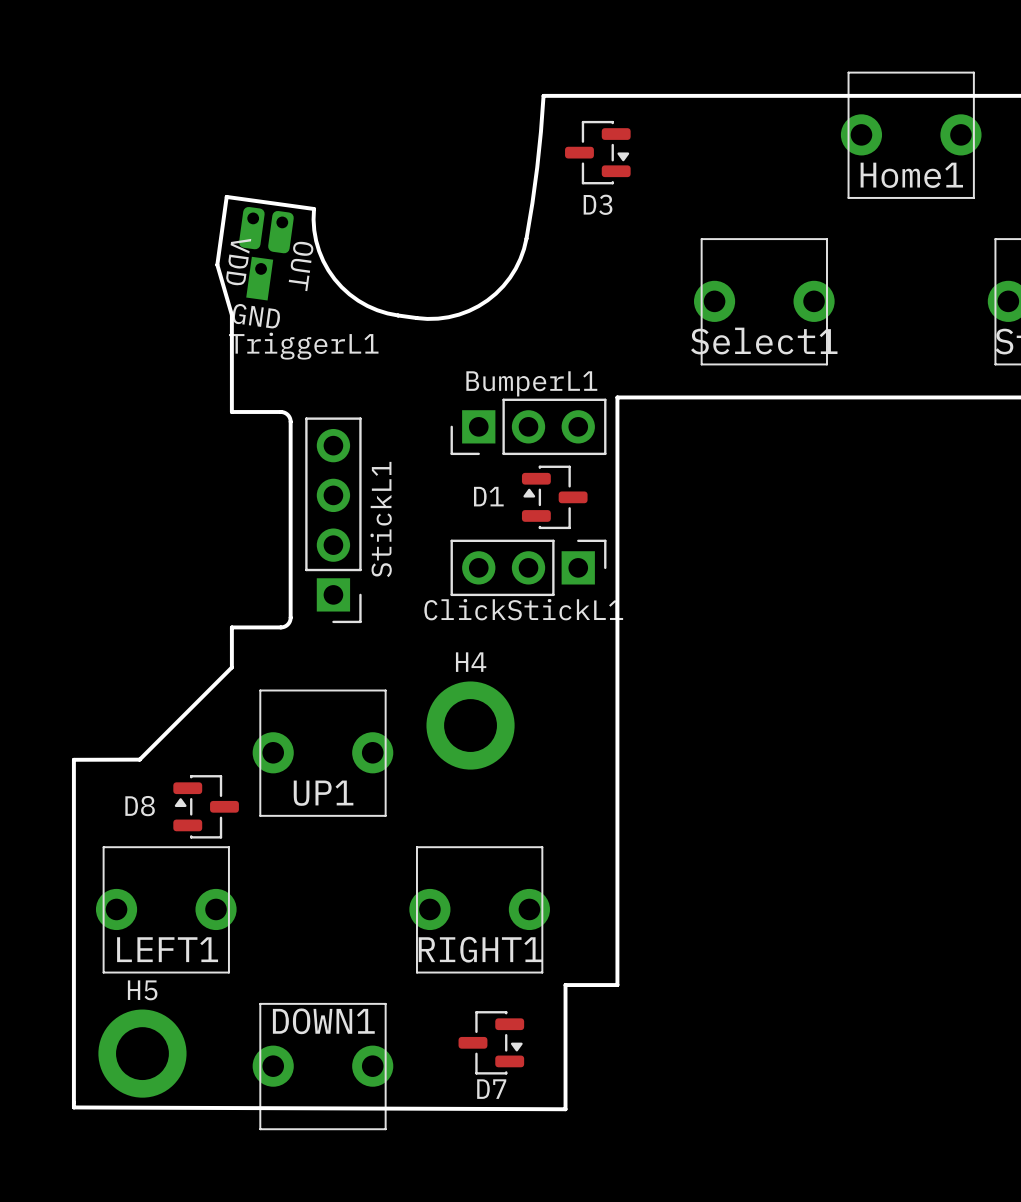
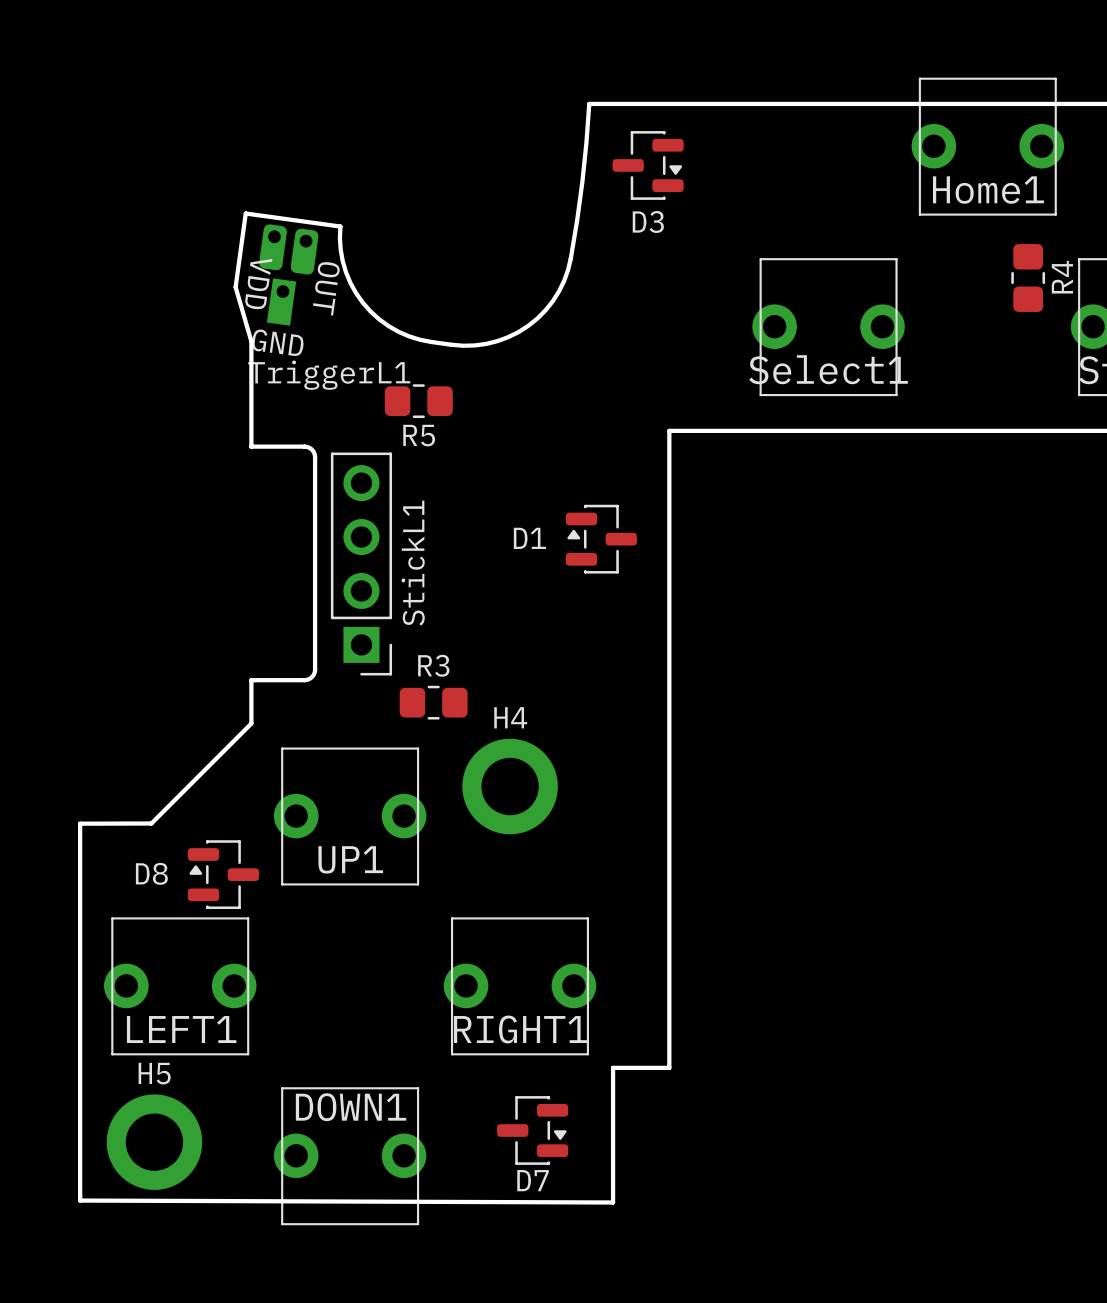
R4: none -> (1028, 278)
R5: none -> (418, 401)
BumperL1: (528, 426) -> none
ClickStickL1: (528, 567) -> none
R3: none -> (433, 702)

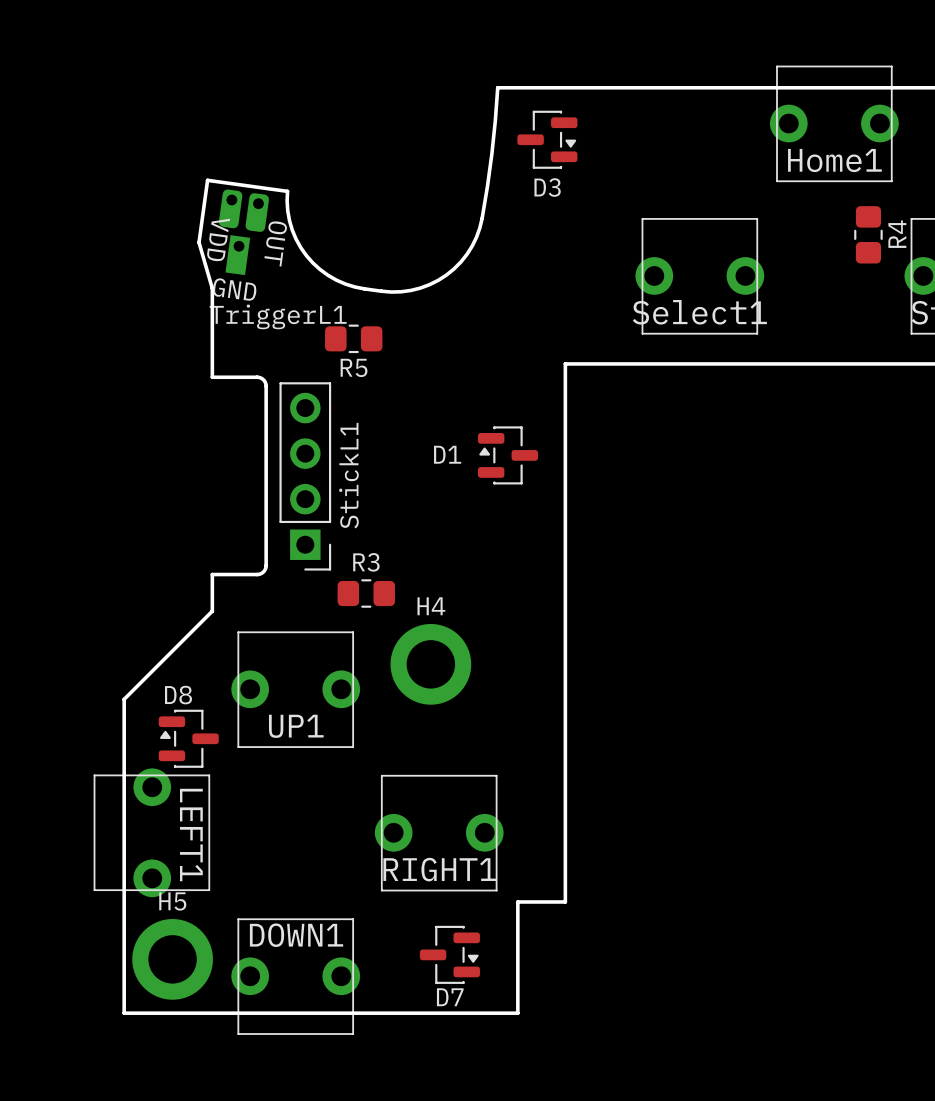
board edge: (151, 823) (80, 823) (80, 1200) (613, 1202) (613, 1199) -> (127, 695) (124, 699) (124, 1013) (517, 1013)
D8 name position: D8 (151, 873) -> D8 (178, 695)
LEFT1 rotation: 0° (180, 986) -> 90° clockwise (151, 832)
LEFT1 name position: LEFT1 (181, 1029) -> LEFT1 (191, 835)
H5 position: (154, 1142) -> (172, 959)

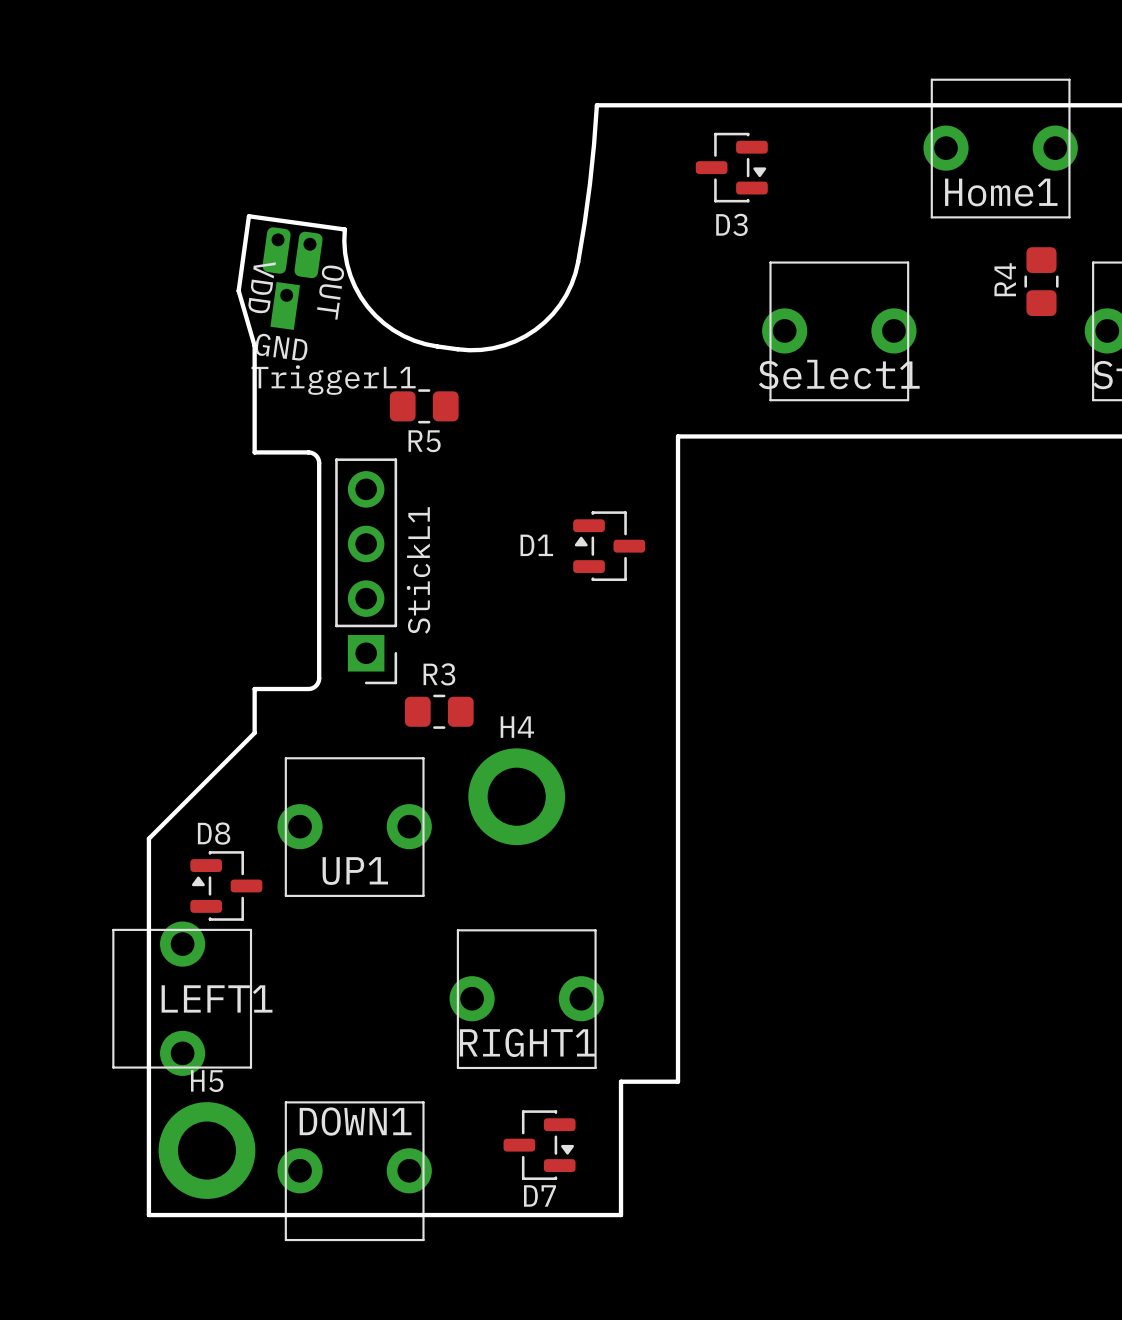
D3 position: (547, 139) -> (731, 167)
R4 name position: R4 (897, 234) -> R4 (1005, 279)
LEFT1 name rotation: 0° (191, 835) -> 90° counterclockwise (217, 998)

